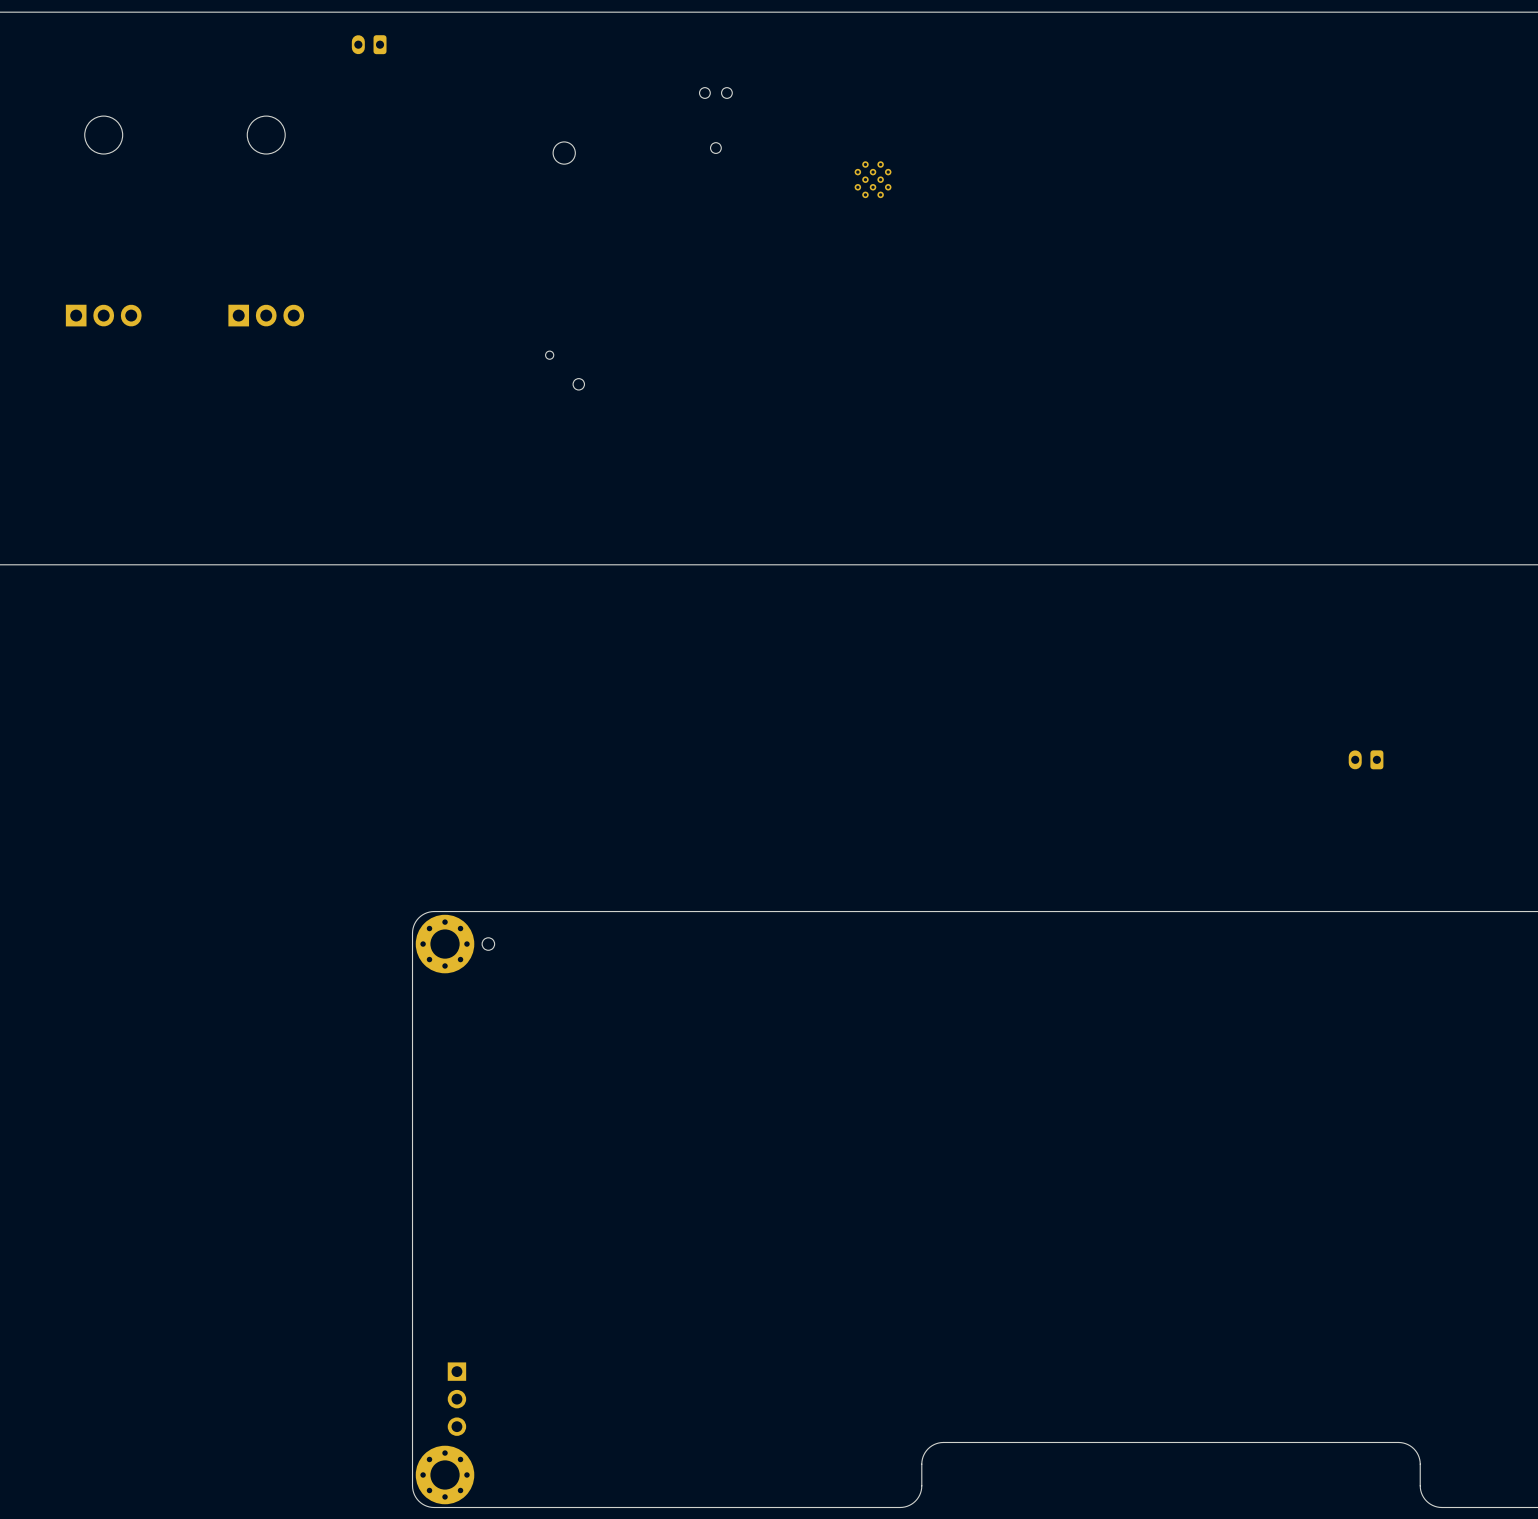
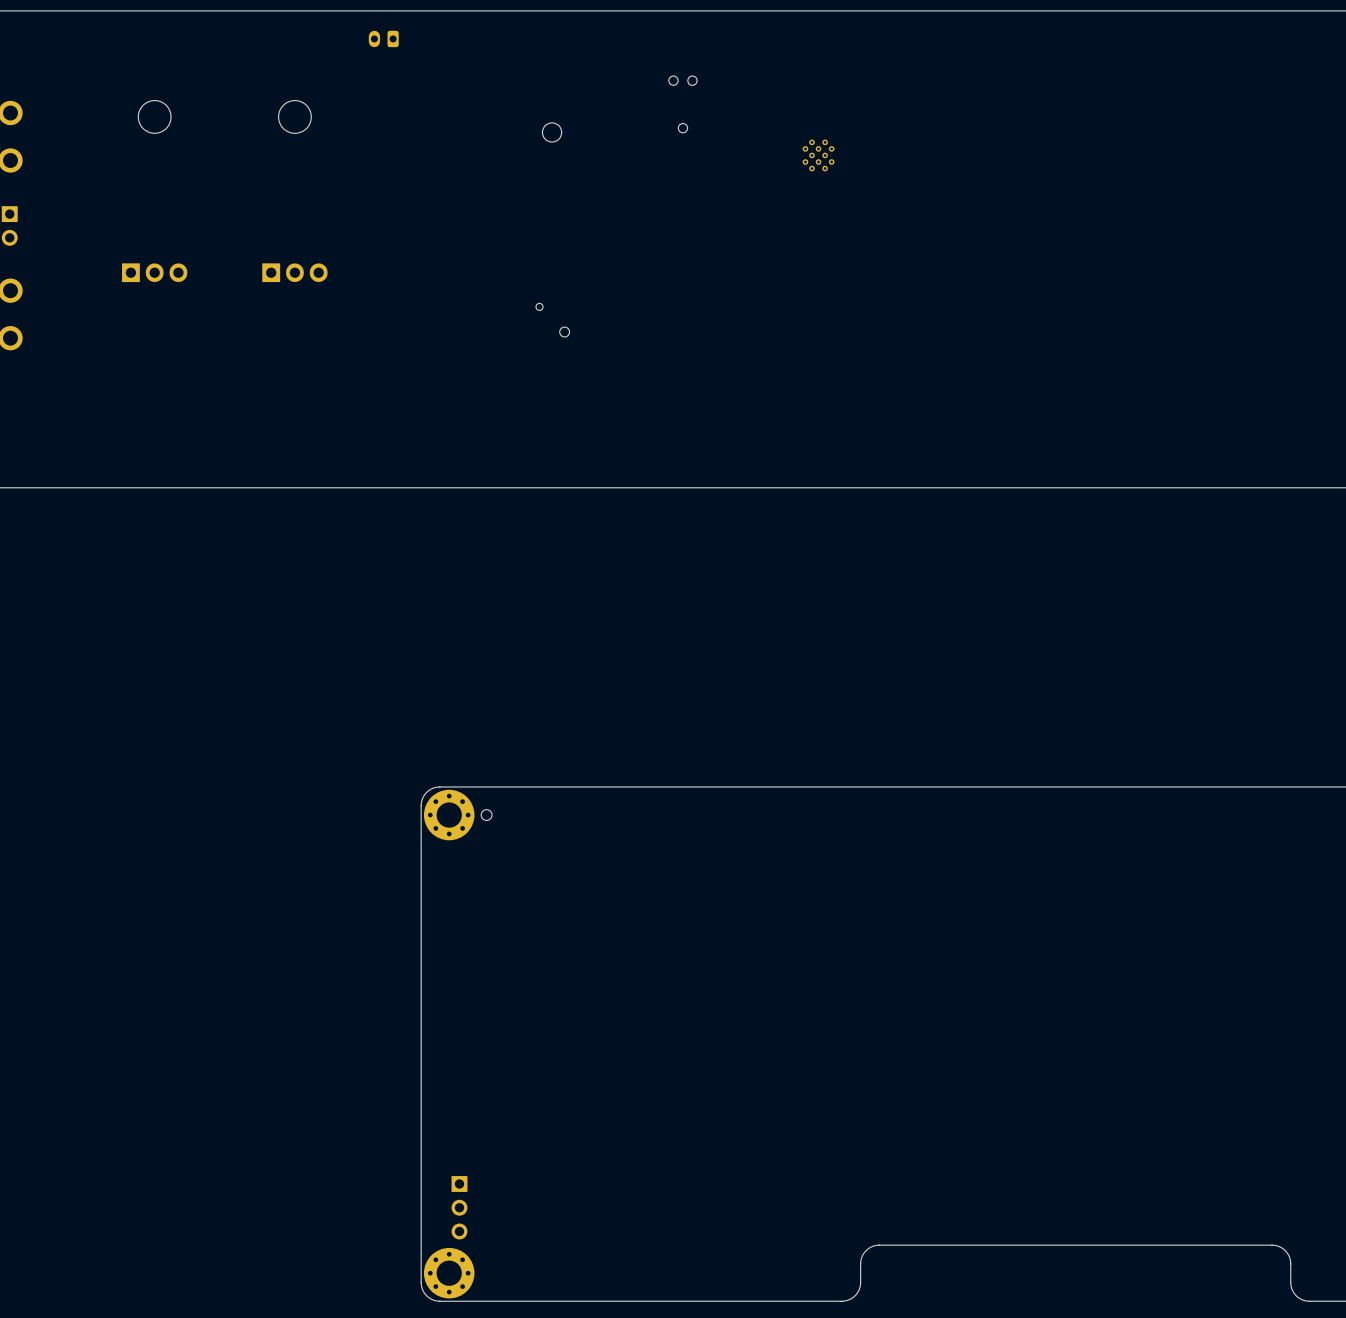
part: (1366, 759) -> none

